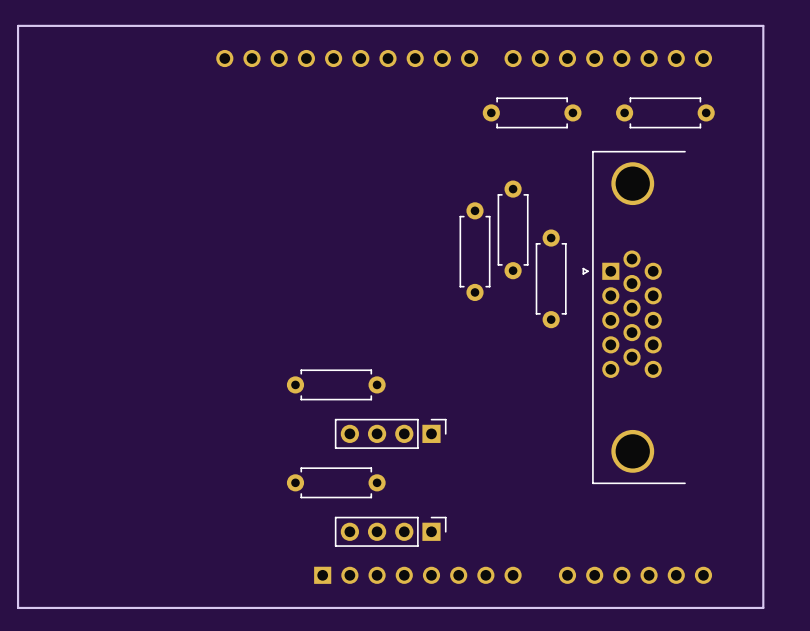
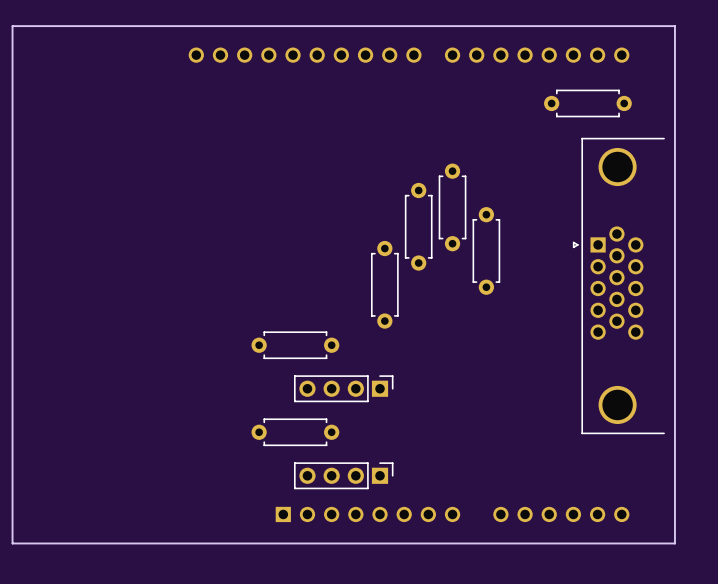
part rotation: 0° (532, 112) -> 90° clockwise (384, 284)
part position: (532, 112) -> (384, 284)
part position: (634, 317) -> (618, 285)

